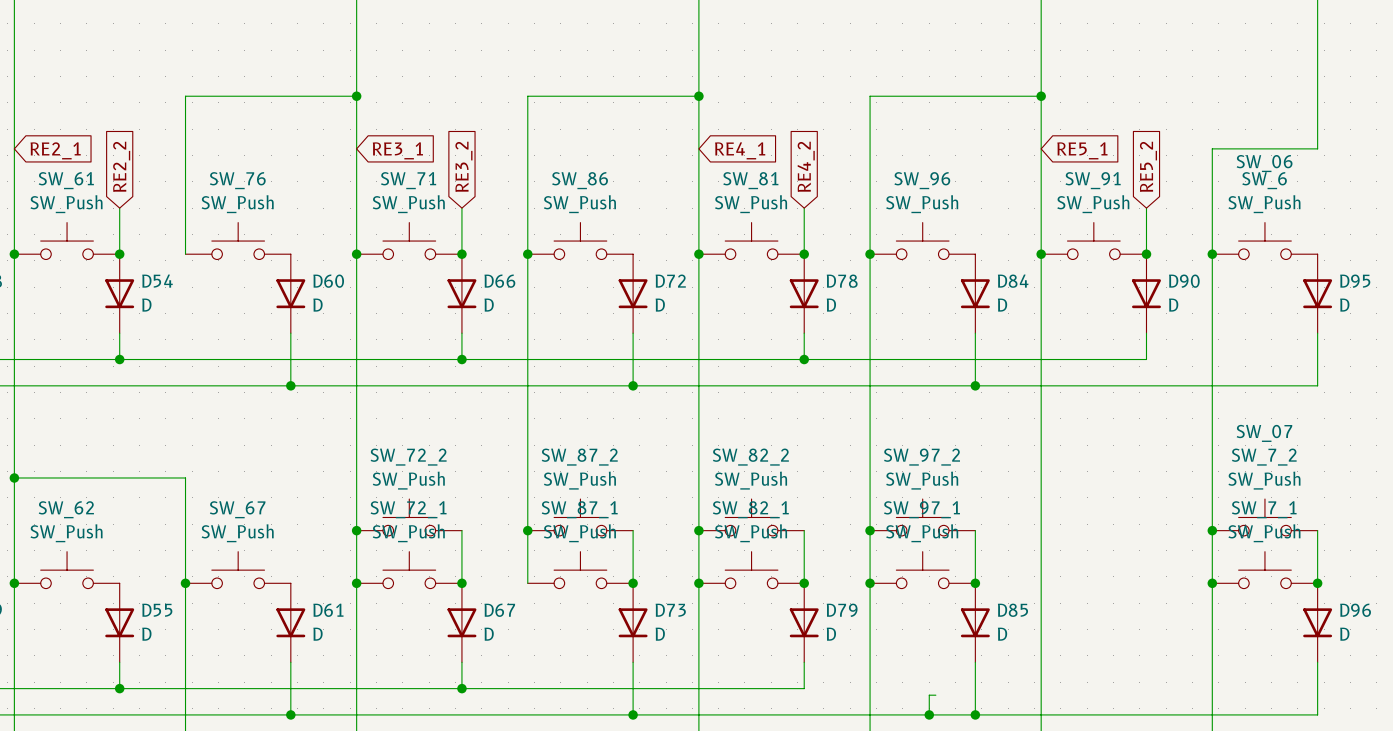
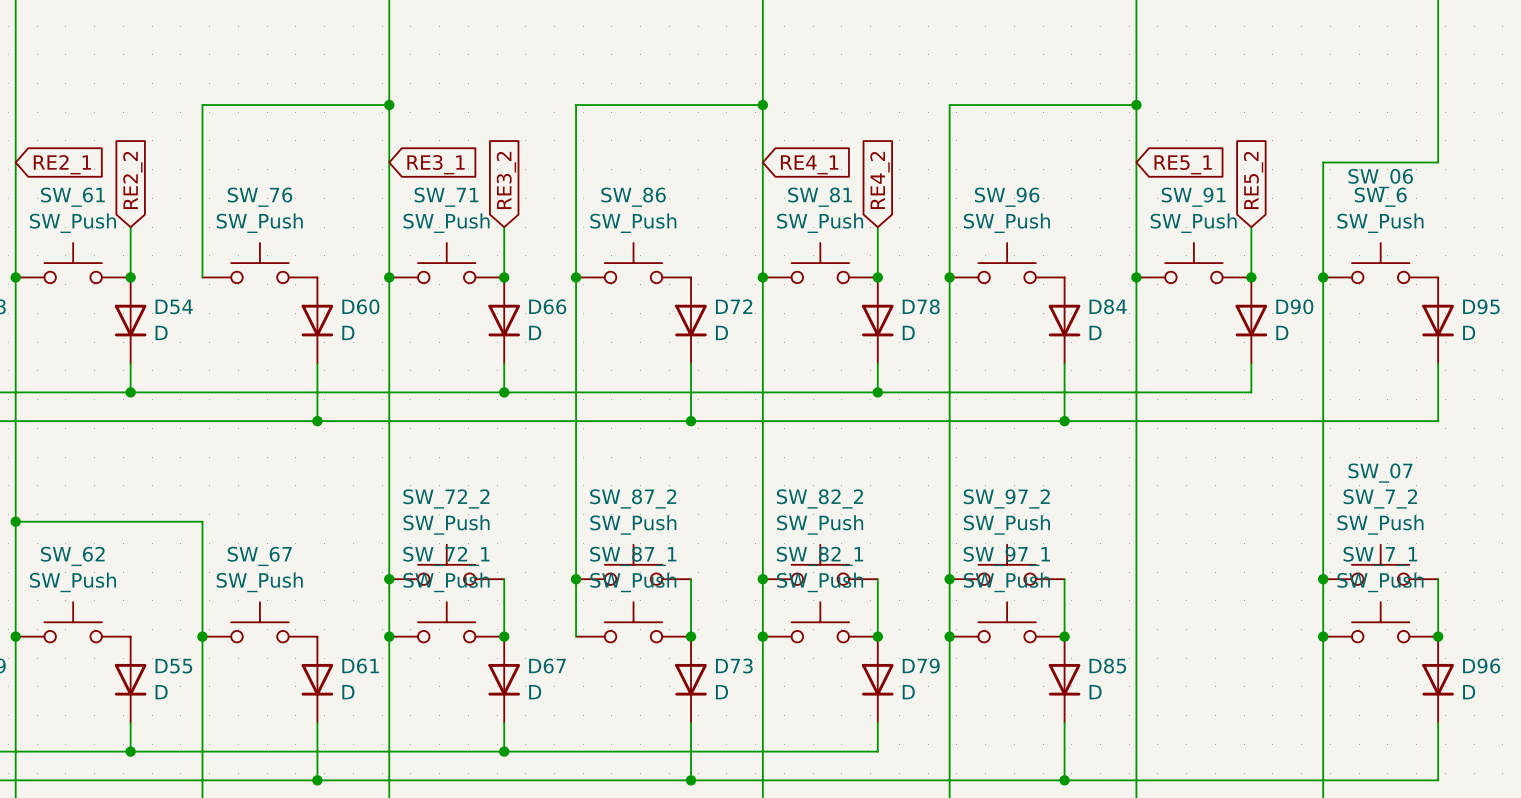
wire: (935, 695) (929, 695) (929, 714) -> none
junction: (929, 714) -> none

